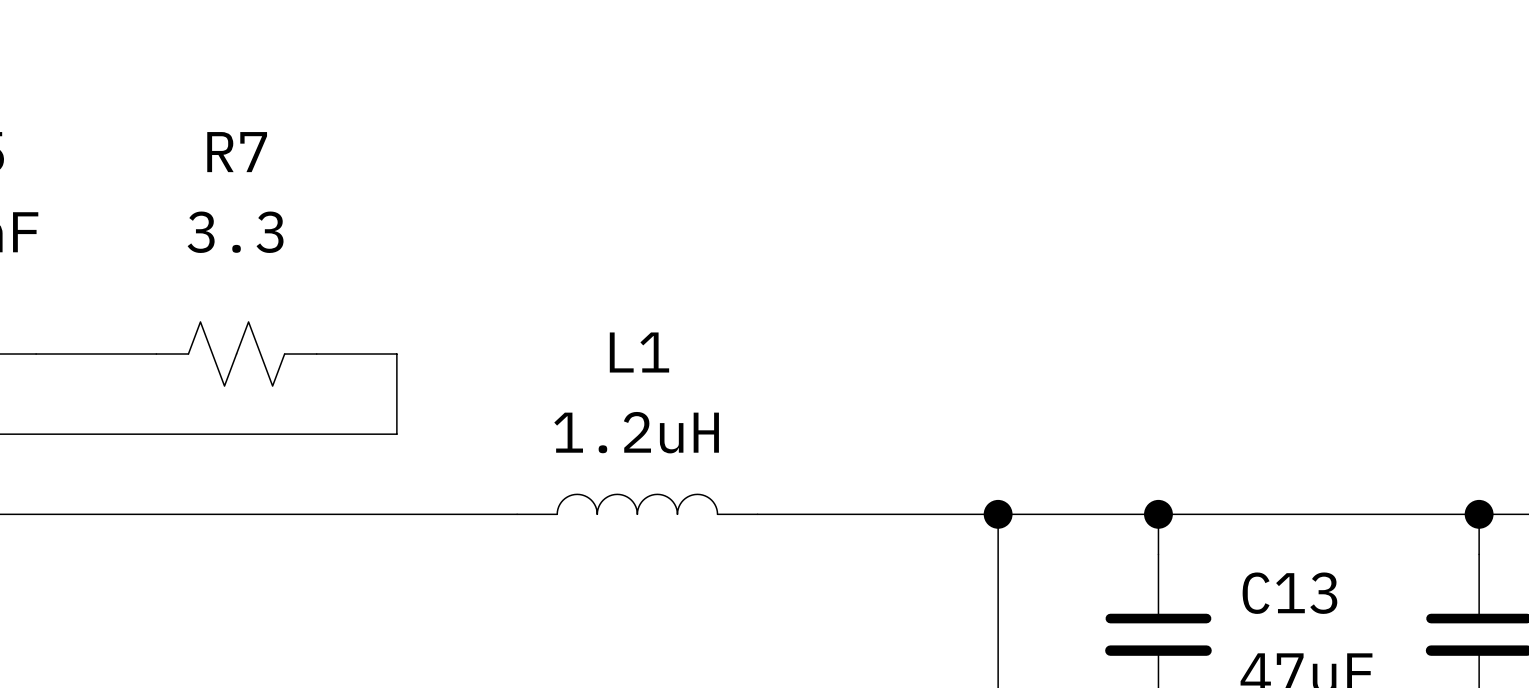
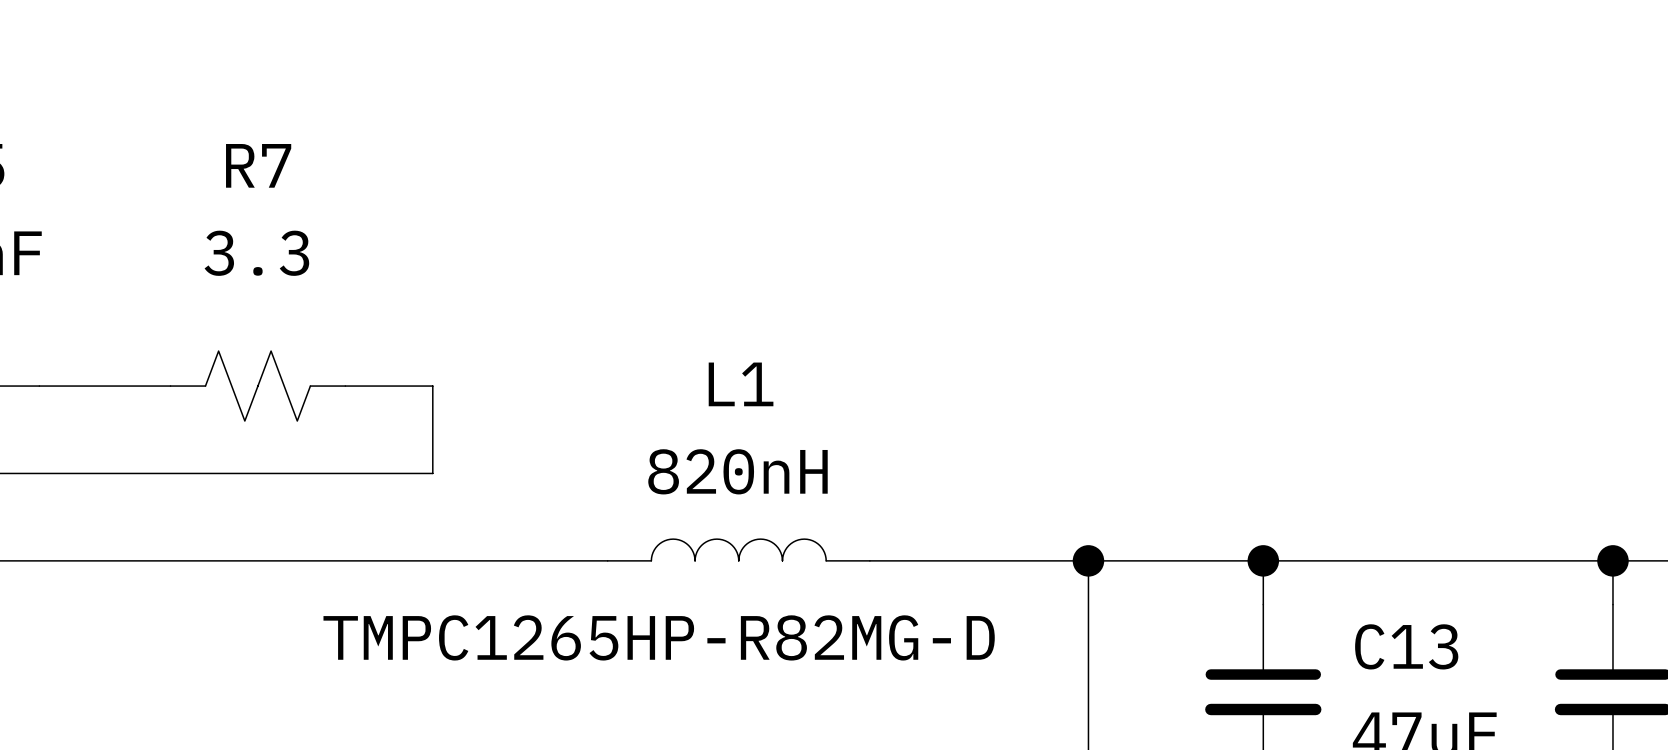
L1 value: 1.2uH (636, 432) -> 820nH (737, 471)
L1 position: (637, 504) -> (738, 550)
L1 text: none -> TMPC1265HP-R82MG-D (659, 637)

